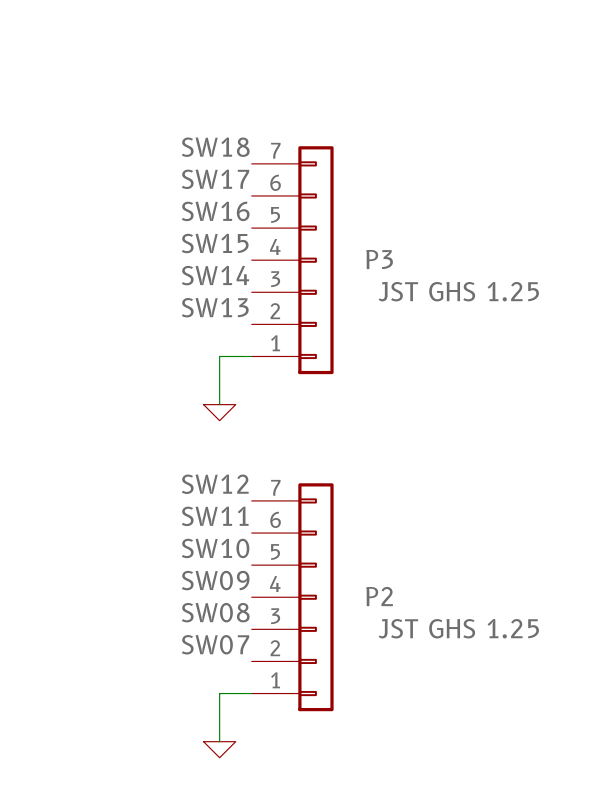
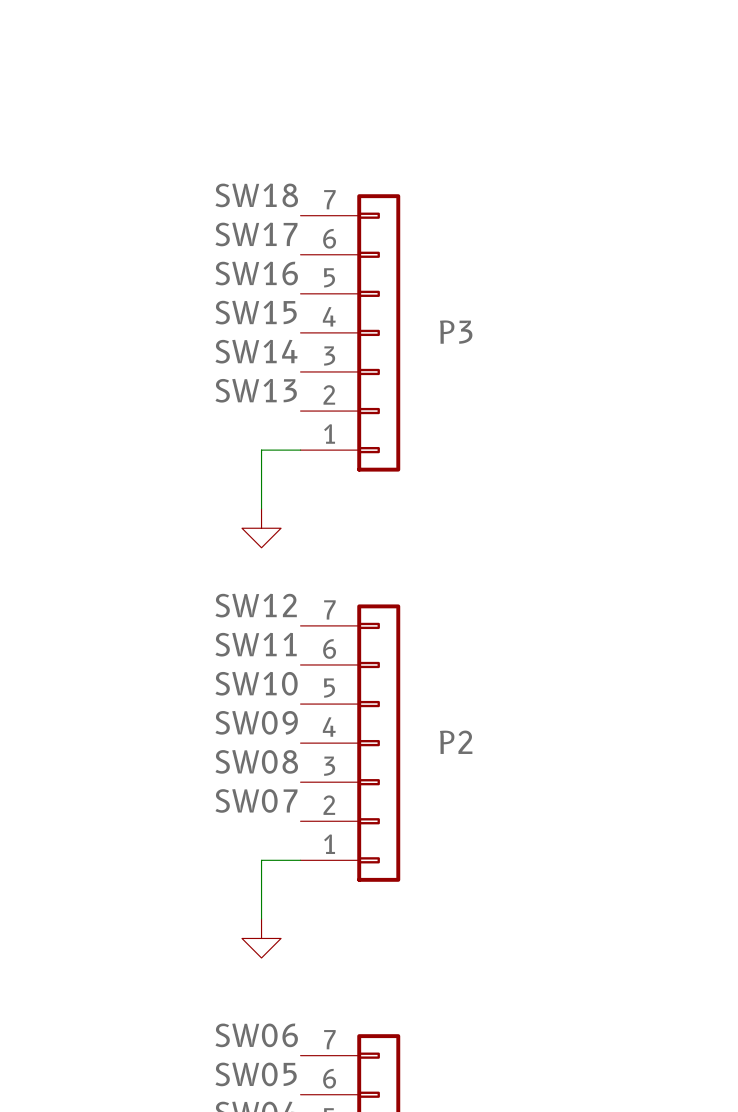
P3 value: JST GHS 1.25 (458, 291) -> none
power symbol shape: [203, 404, 236, 421] -> [242, 508, 282, 548]
P2 value: JST GHS 1.25 (458, 628) -> none
power symbol shape: [203, 741, 236, 758] -> [242, 918, 282, 958]

